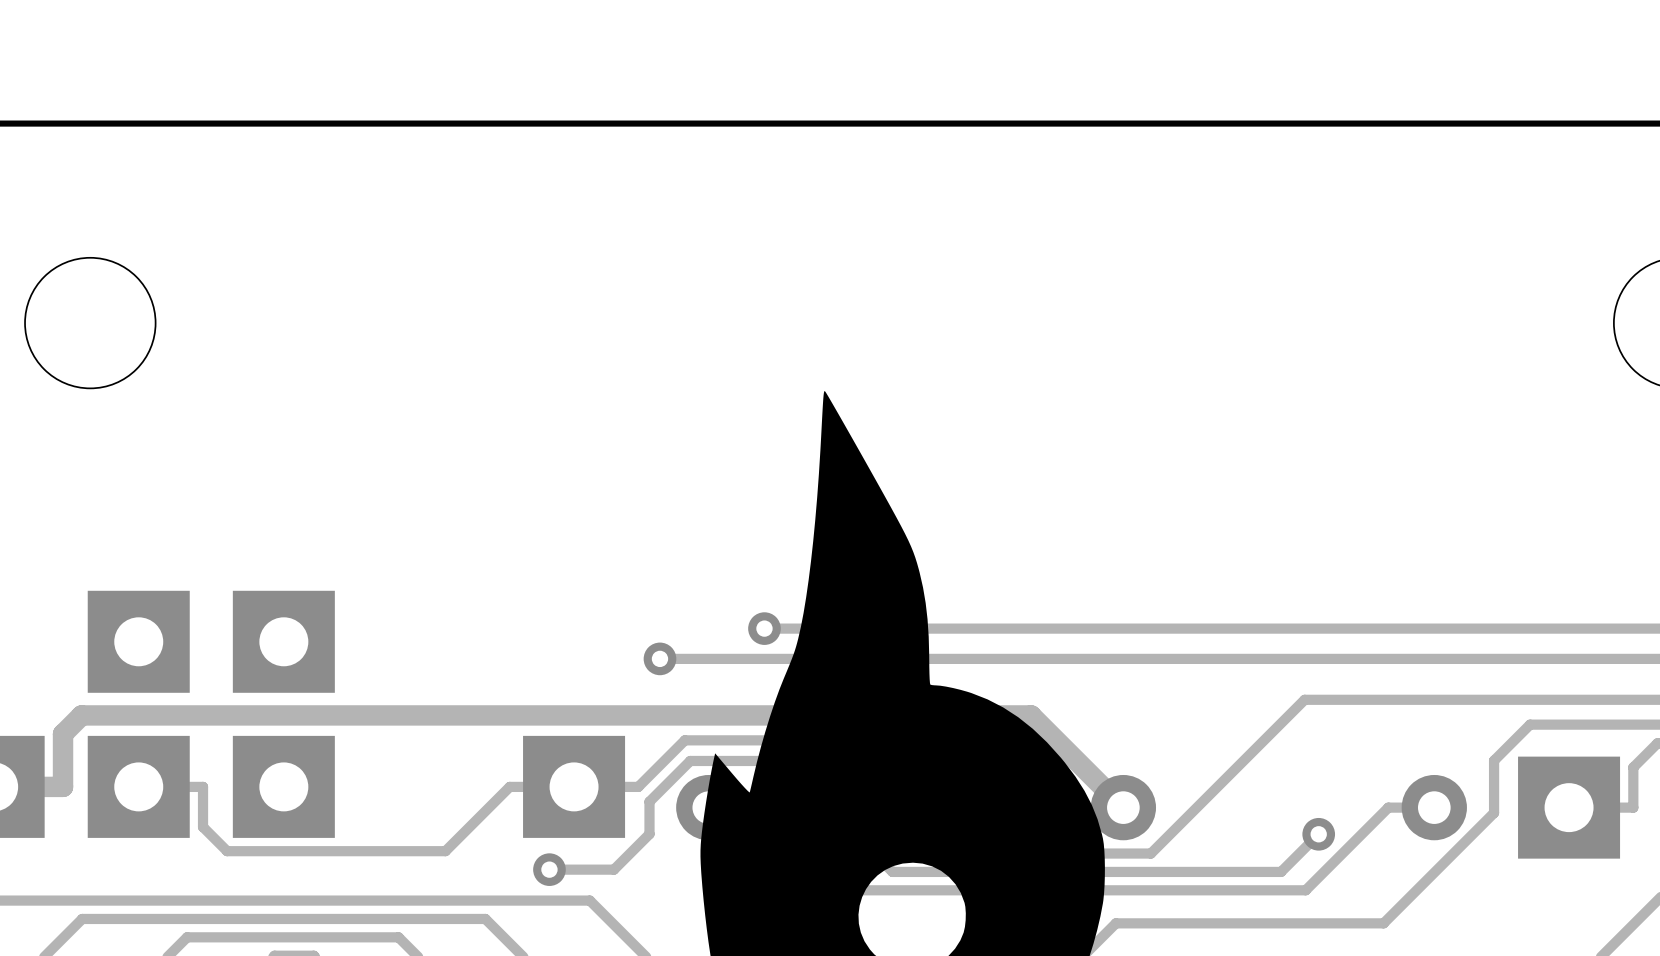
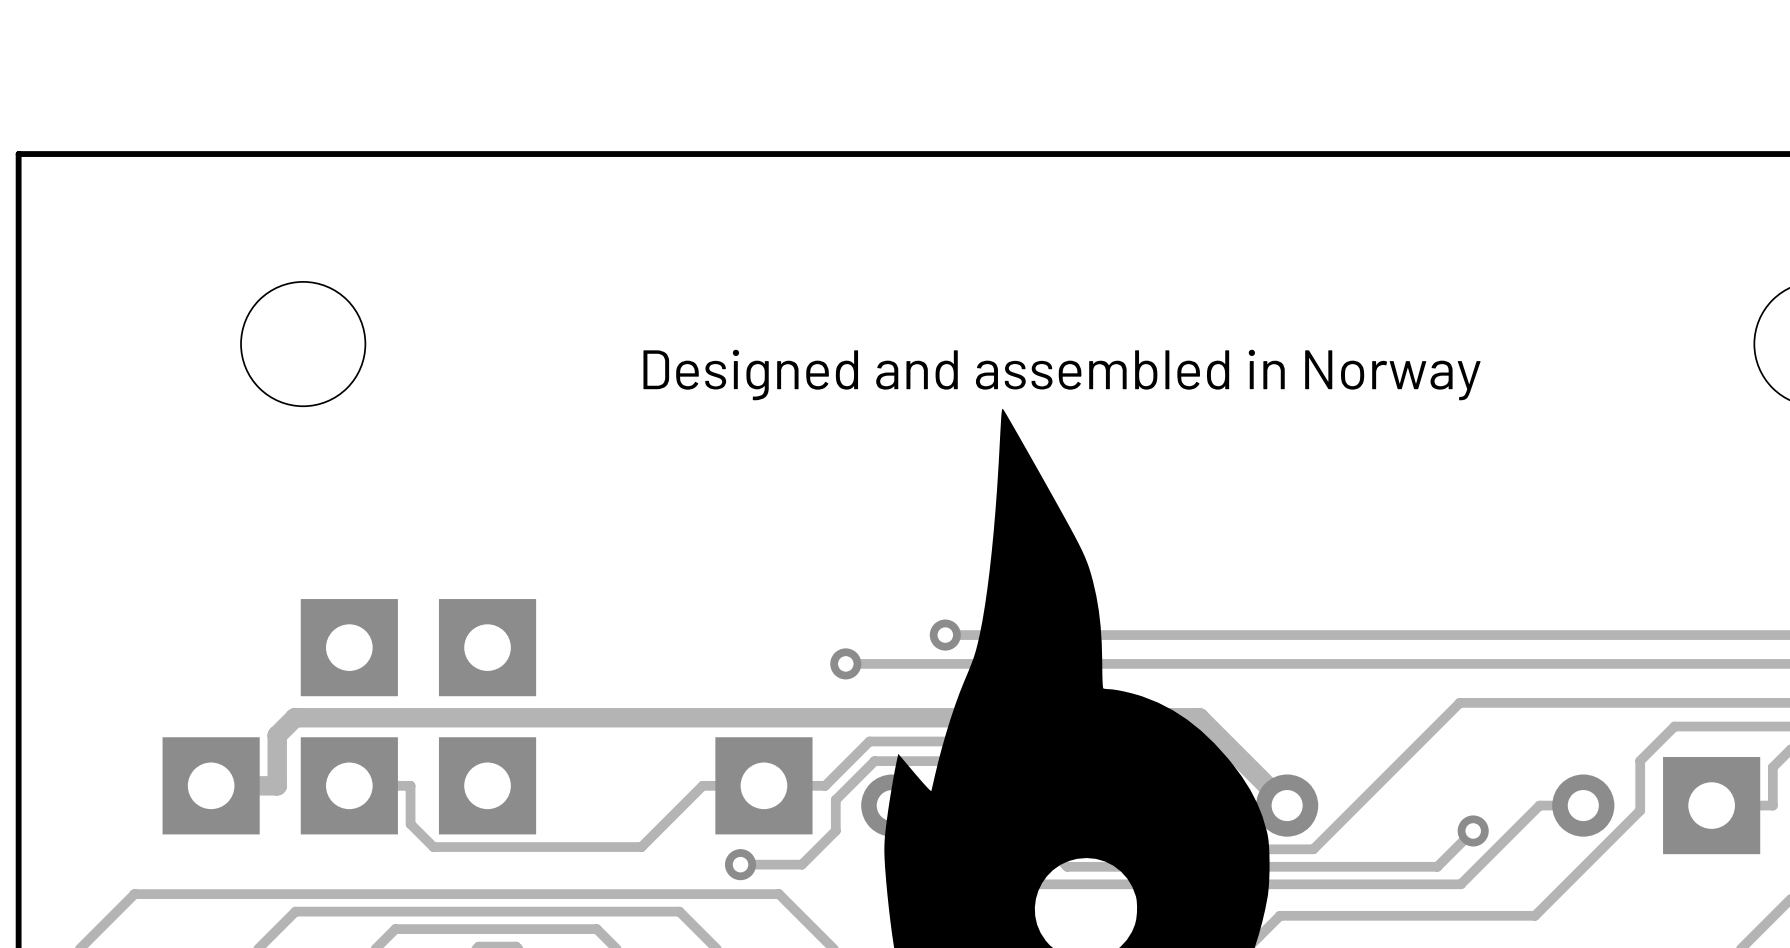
text: none -> Designed and assembled in Norway (1062, 375)

